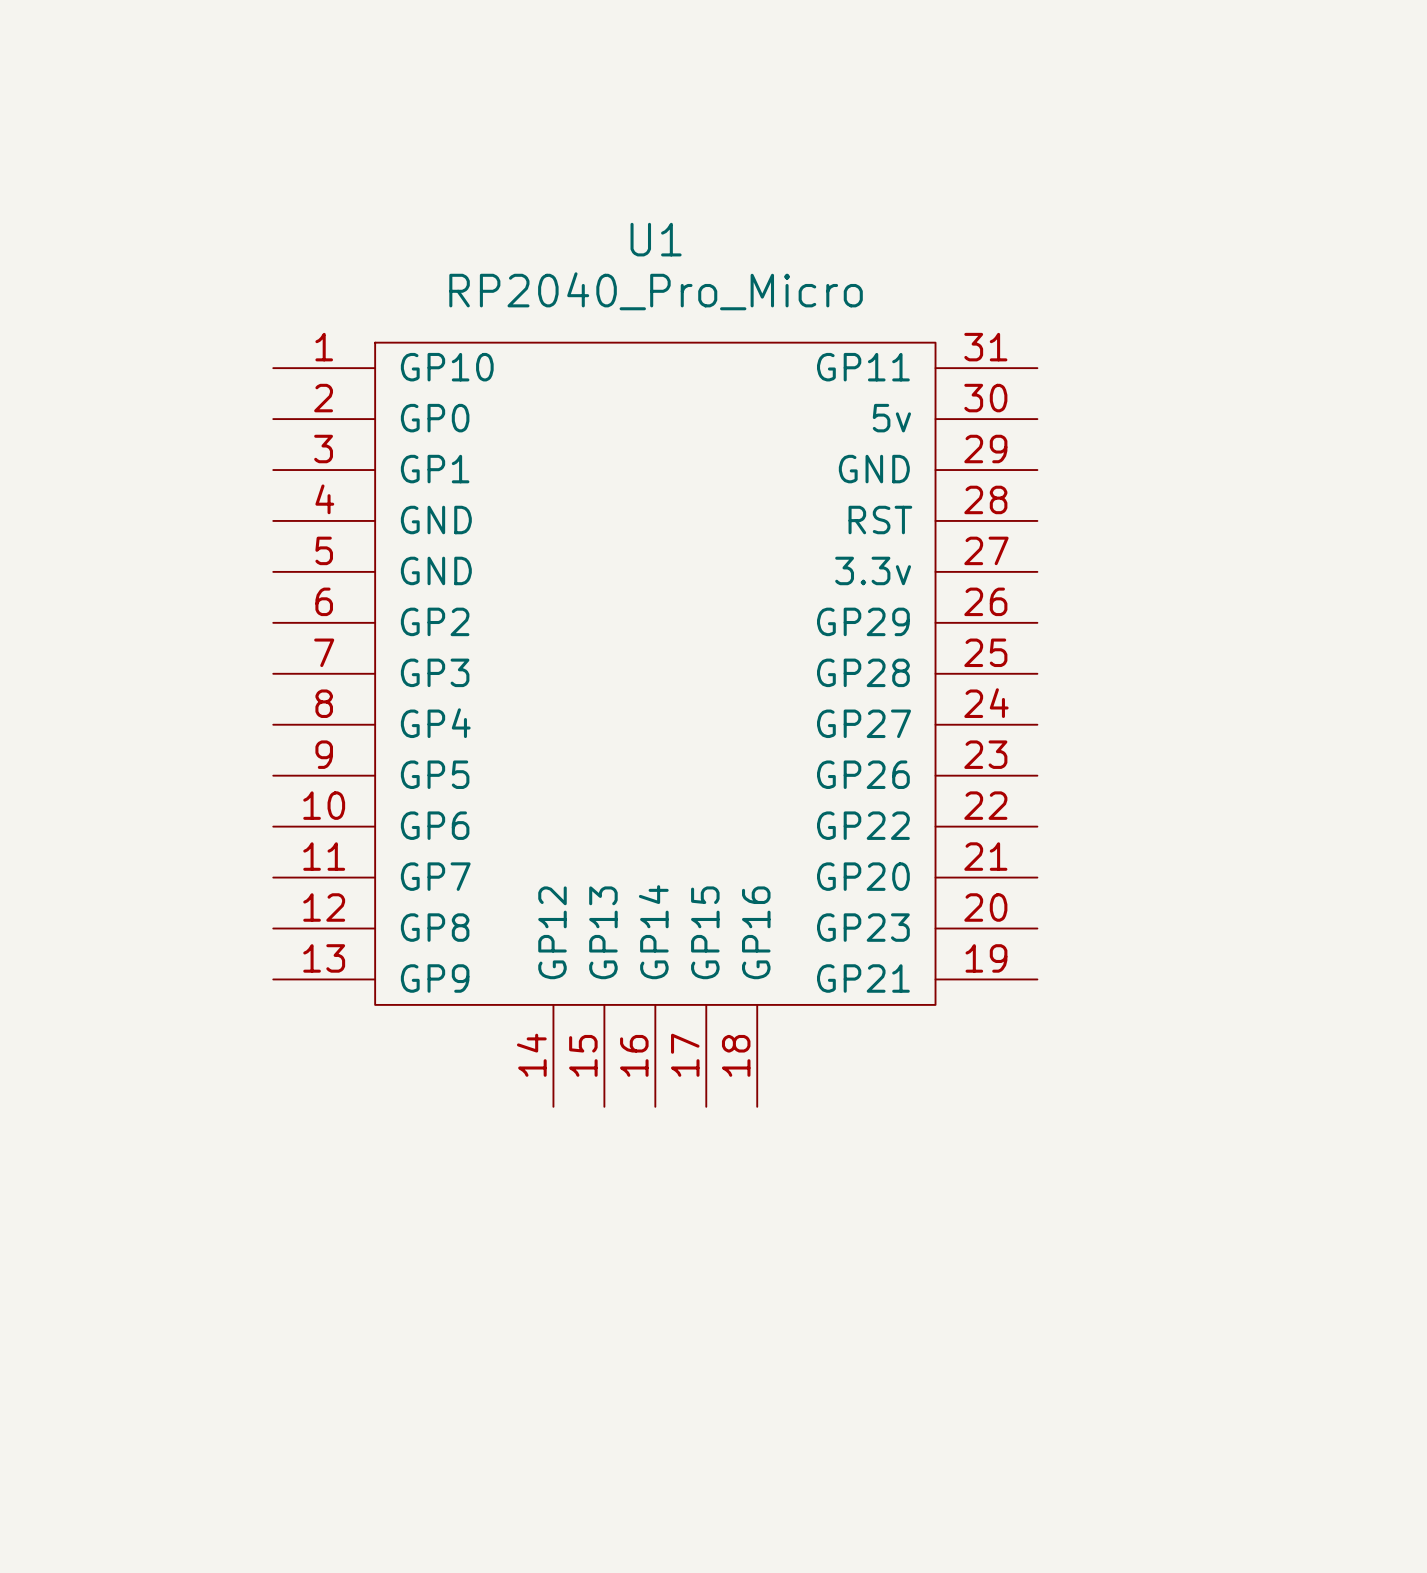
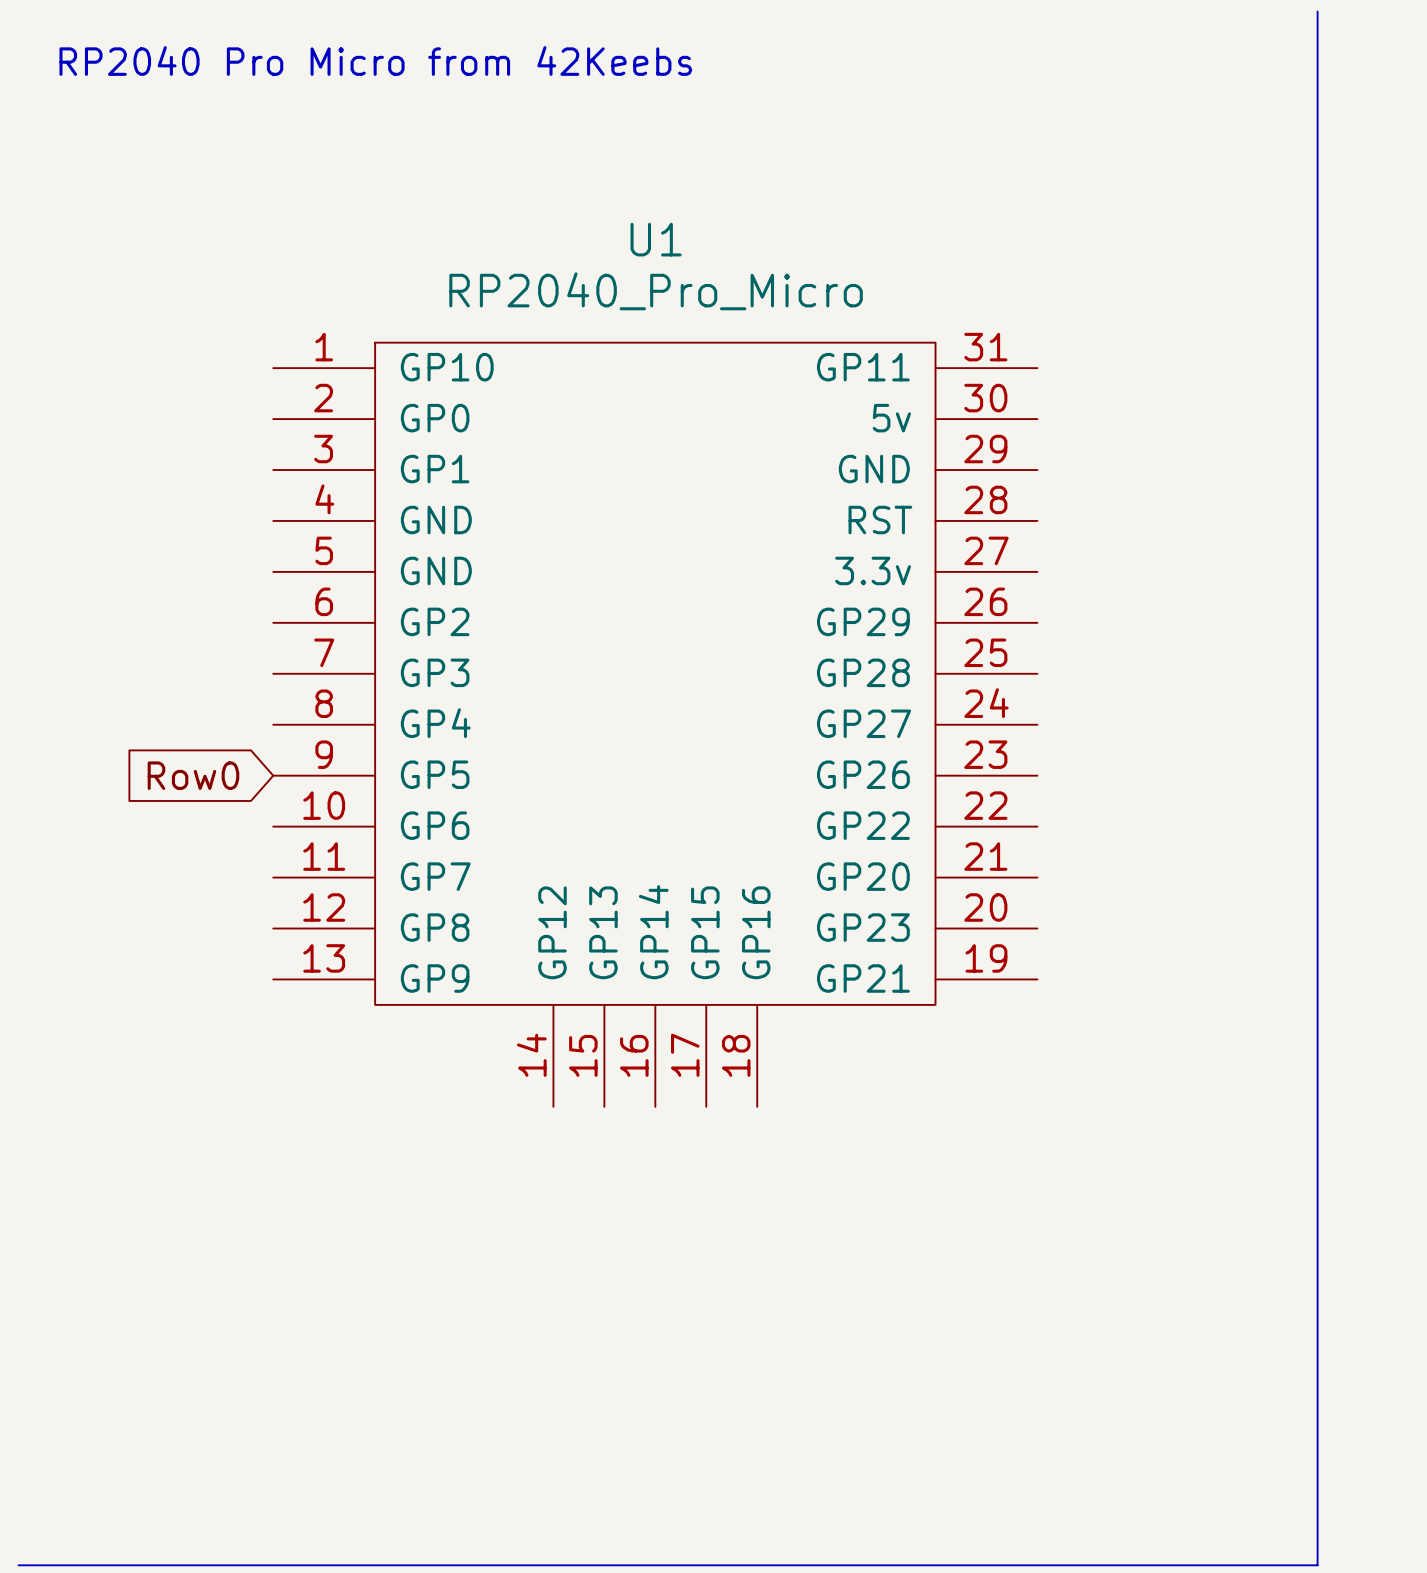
line: none -> (1317, 11) (1317, 1565) (18, 1565)
text: none -> RP2040 Pro Micro from 42Keebs (375, 60)
global label: none -> Row0 (193, 775)

